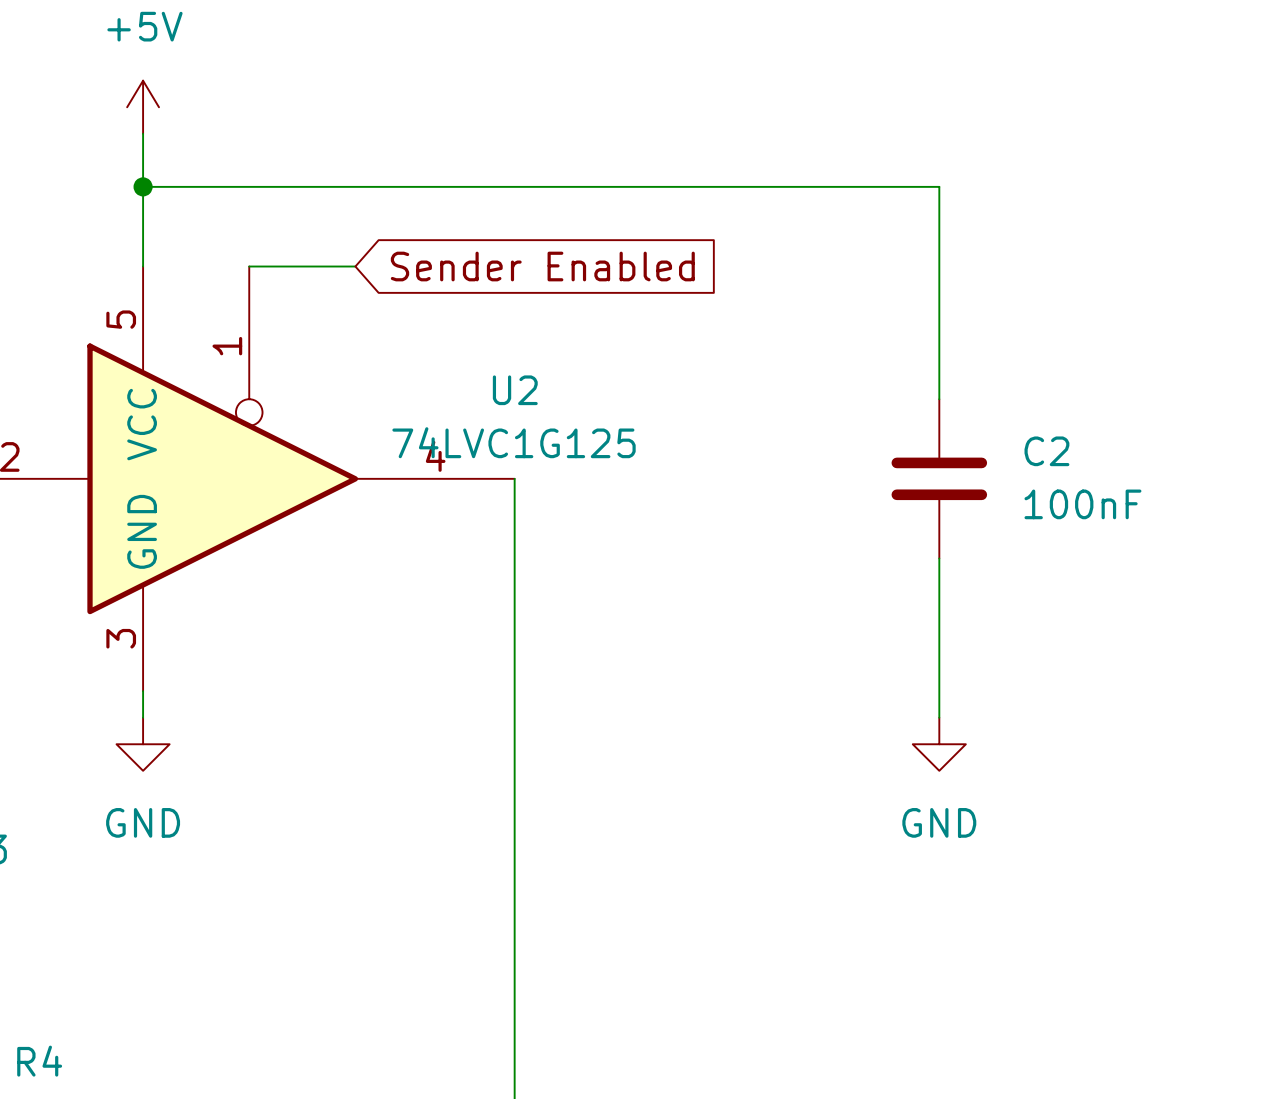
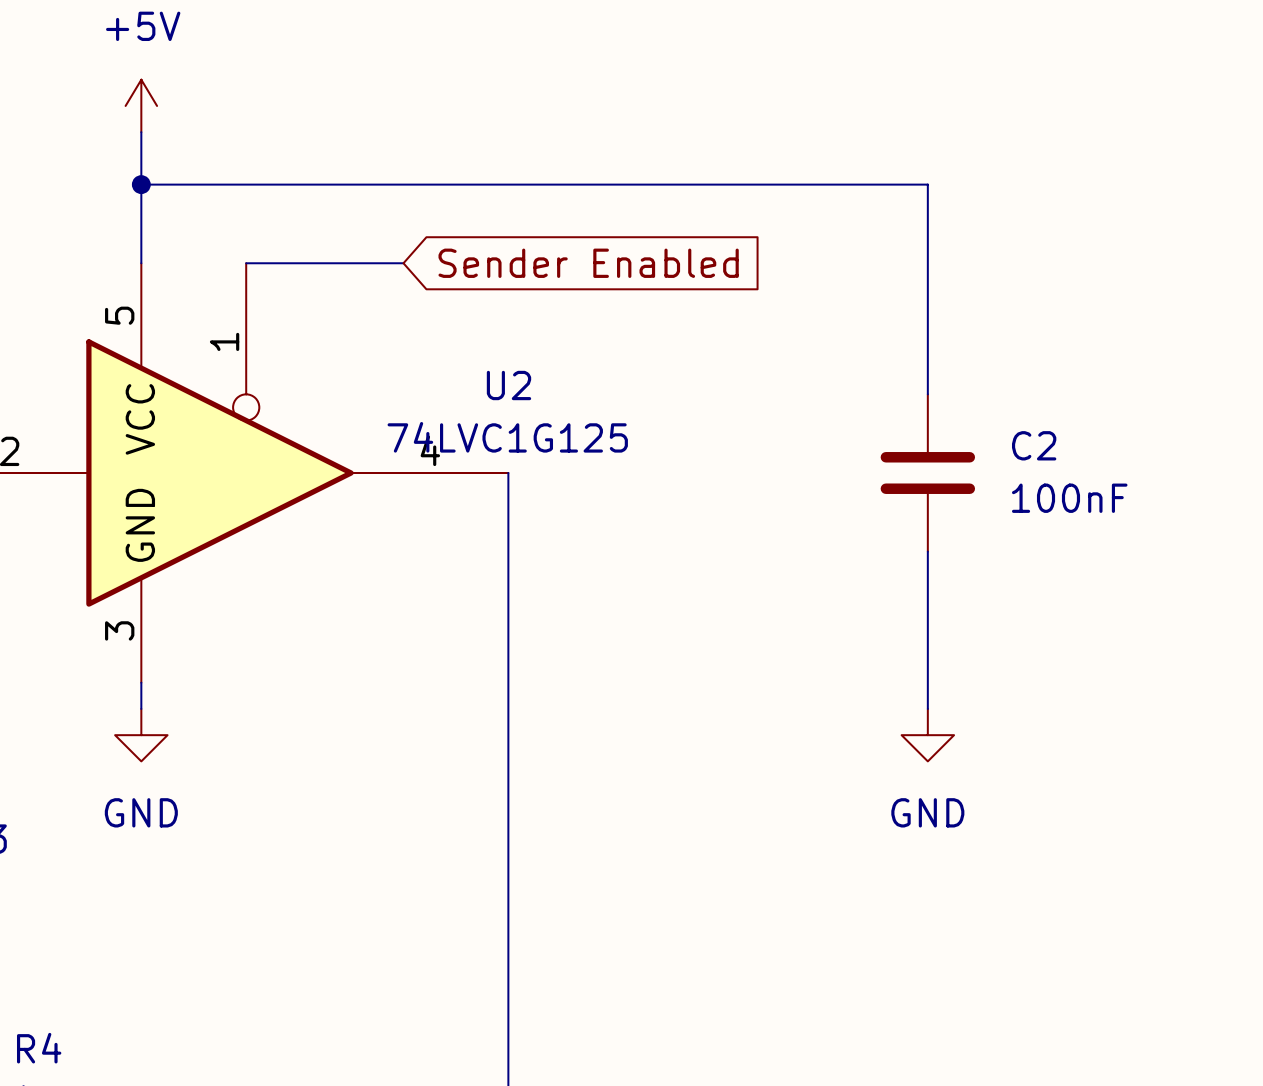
wire: none -> (351, 263) (403, 263)
global label position: Sender Enabled (542, 266) -> Sender Enabled (588, 263)

